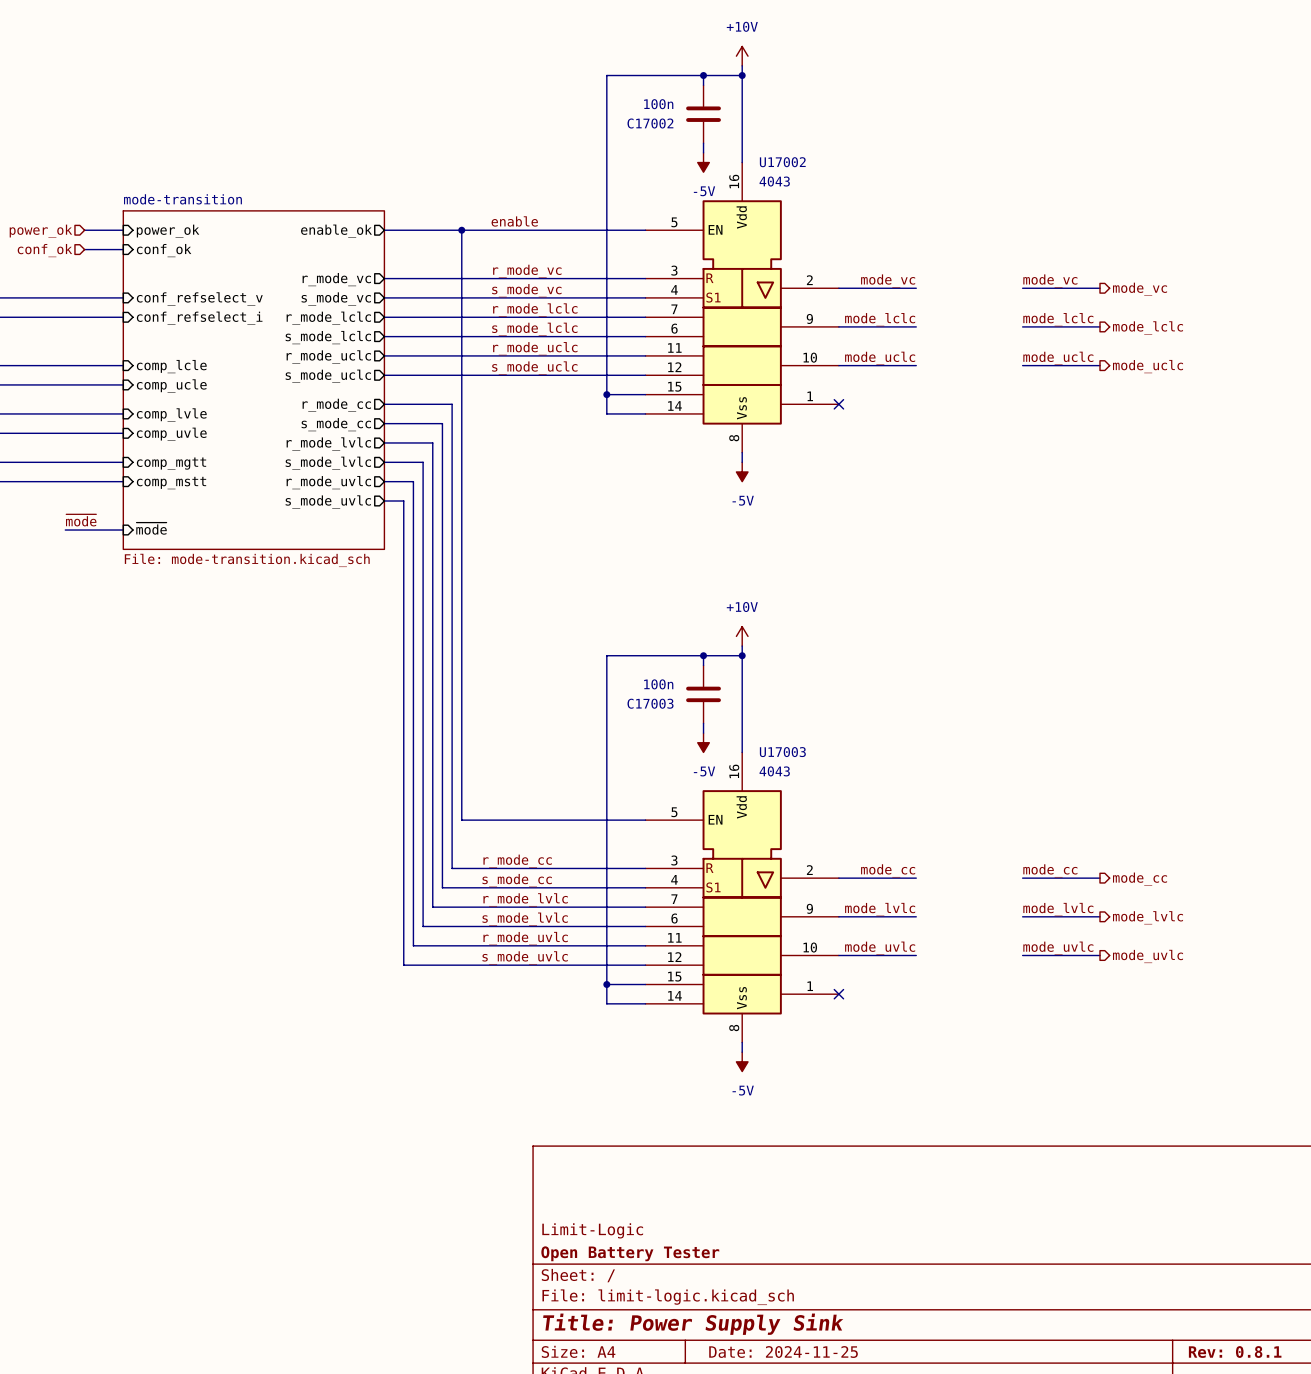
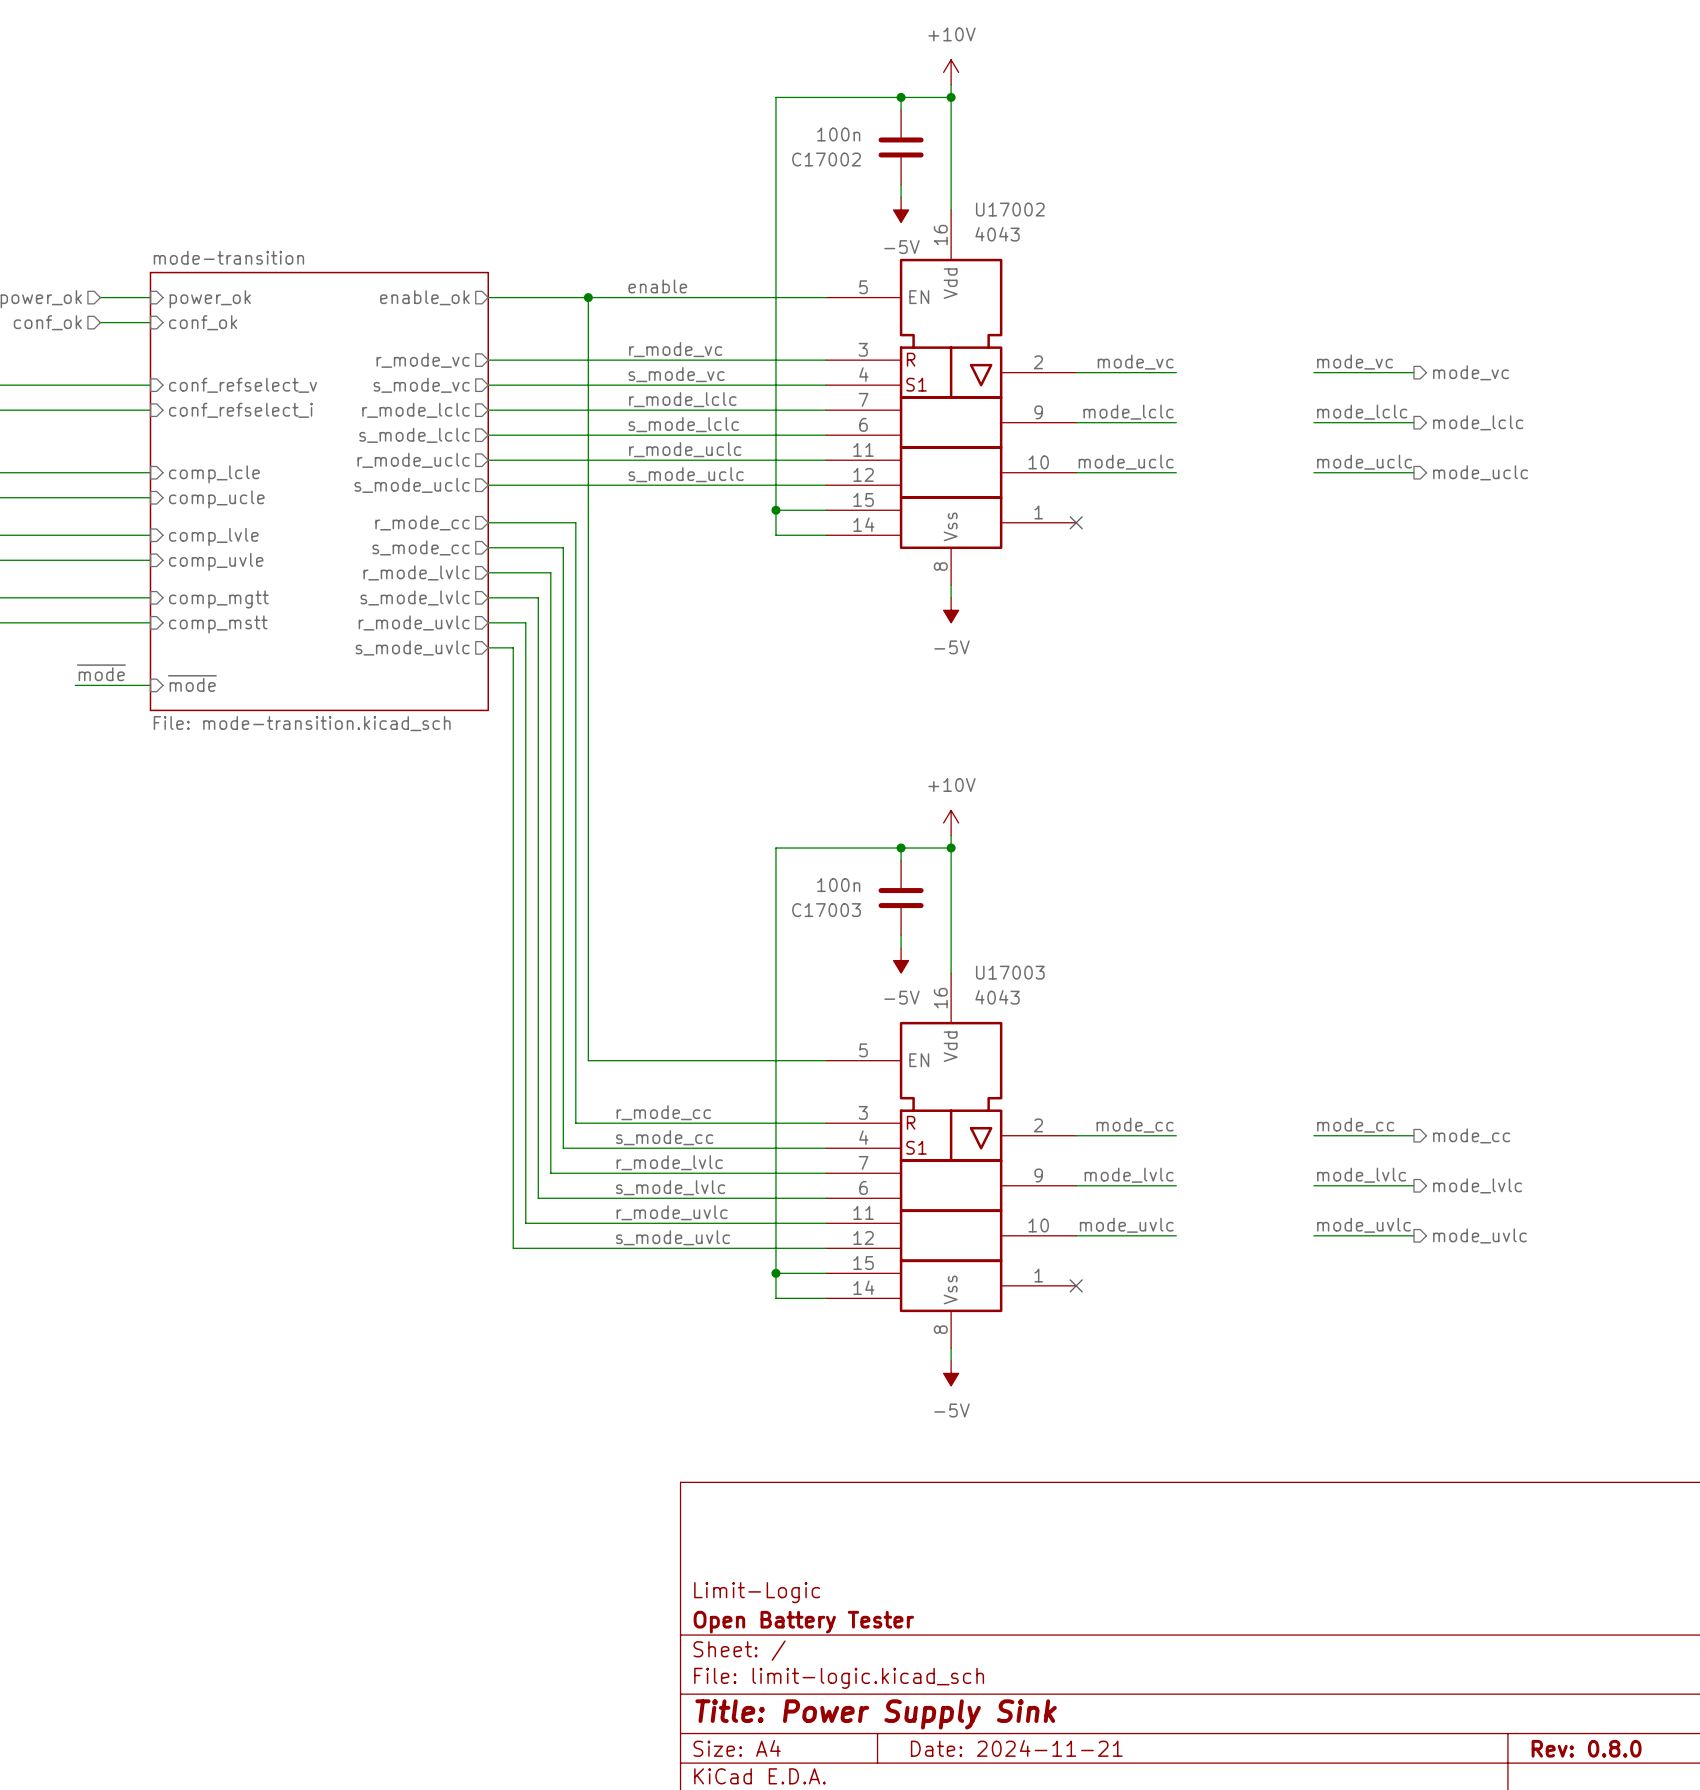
title block: Date: 2024-11-25 (783, 1352) -> Date: 2024-11-21 (1016, 1748)
title block: Rev: 0.8.1 (1235, 1352) -> Rev: 0.8.0 (1586, 1748)

